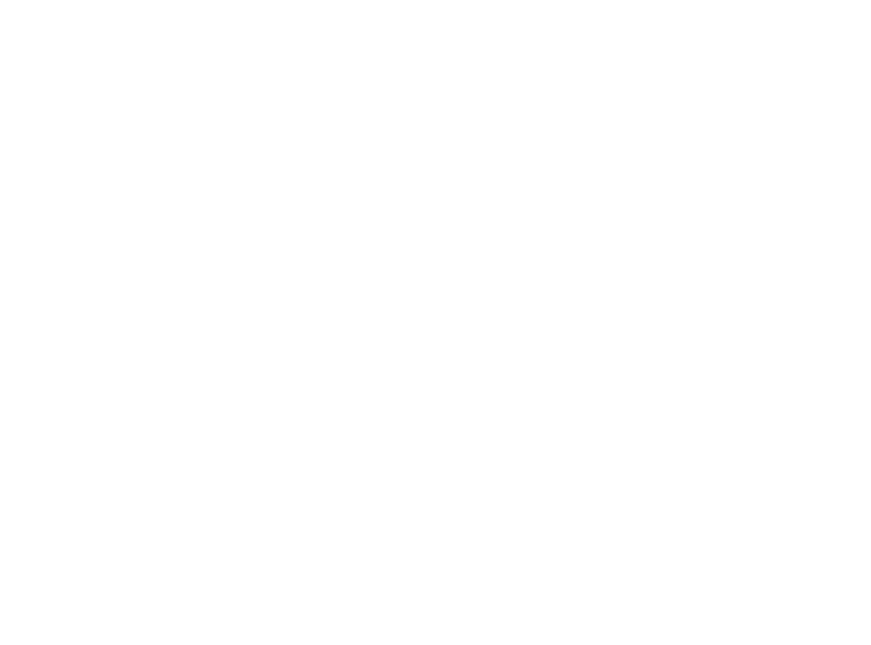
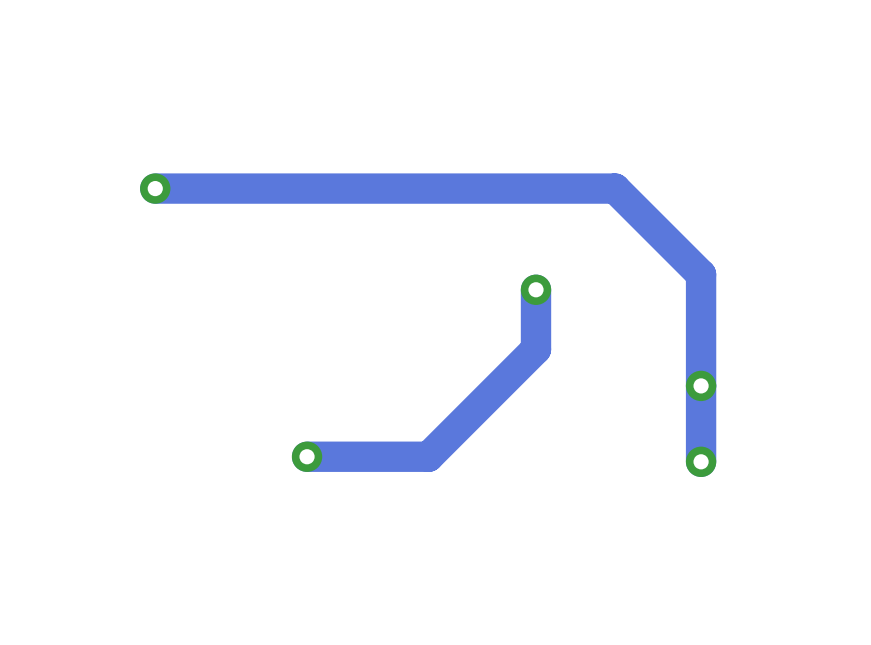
track: none -> (155, 188) (615, 188) (701, 274) (701, 461)
via: none -> (155, 188)
track: none -> (536, 289) (536, 349) (428, 456) (307, 456)
via: none -> (536, 289)
via: none -> (701, 385)
via: none -> (307, 456)
via: none -> (701, 461)

